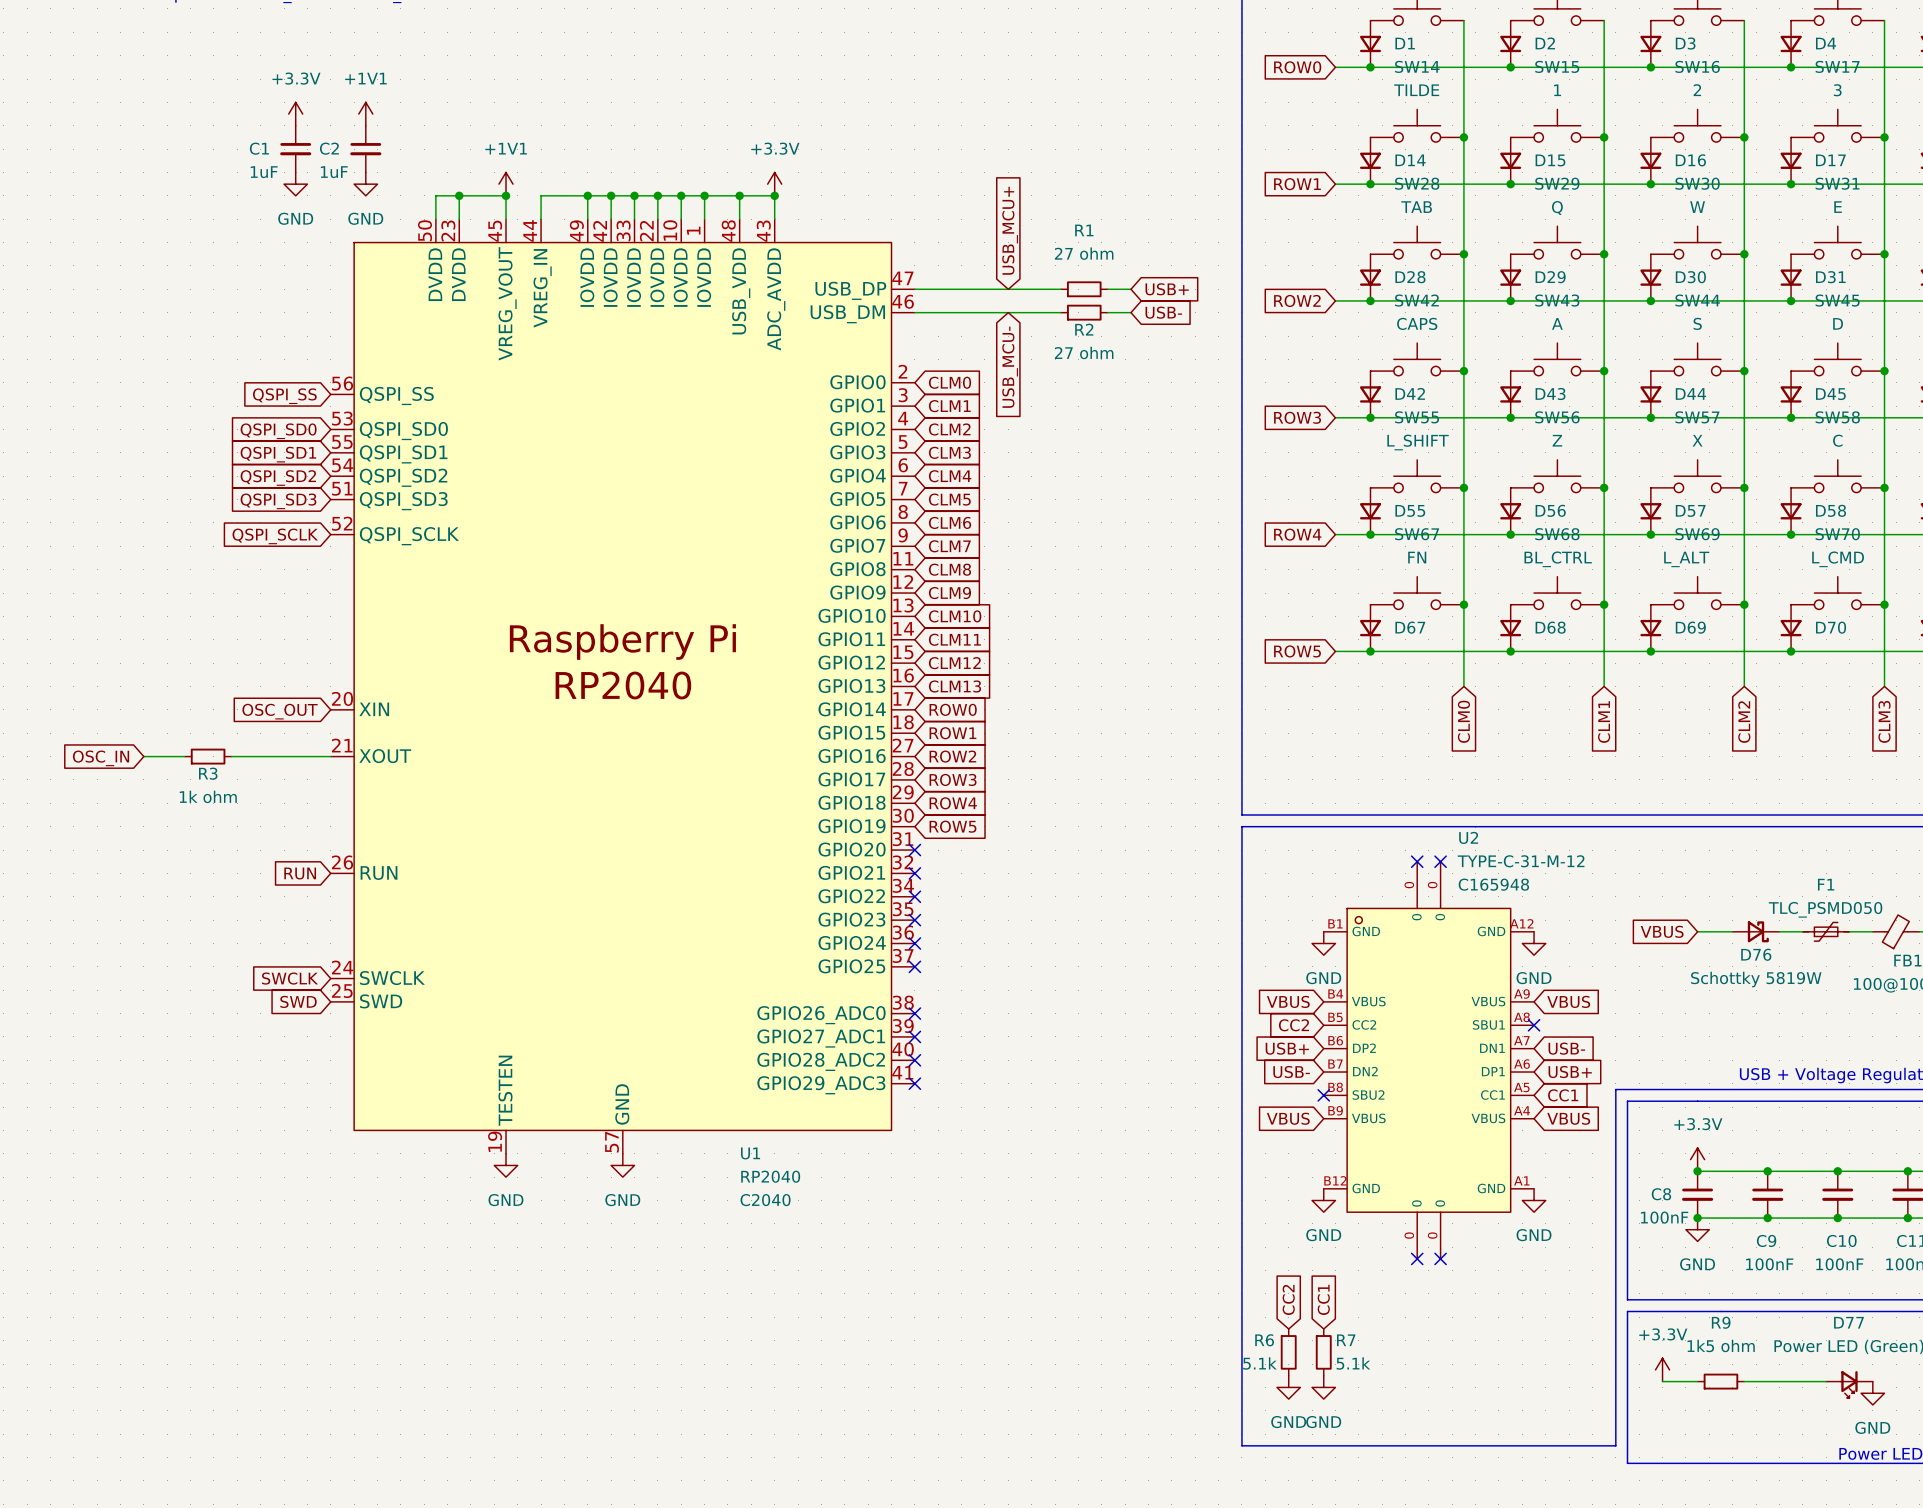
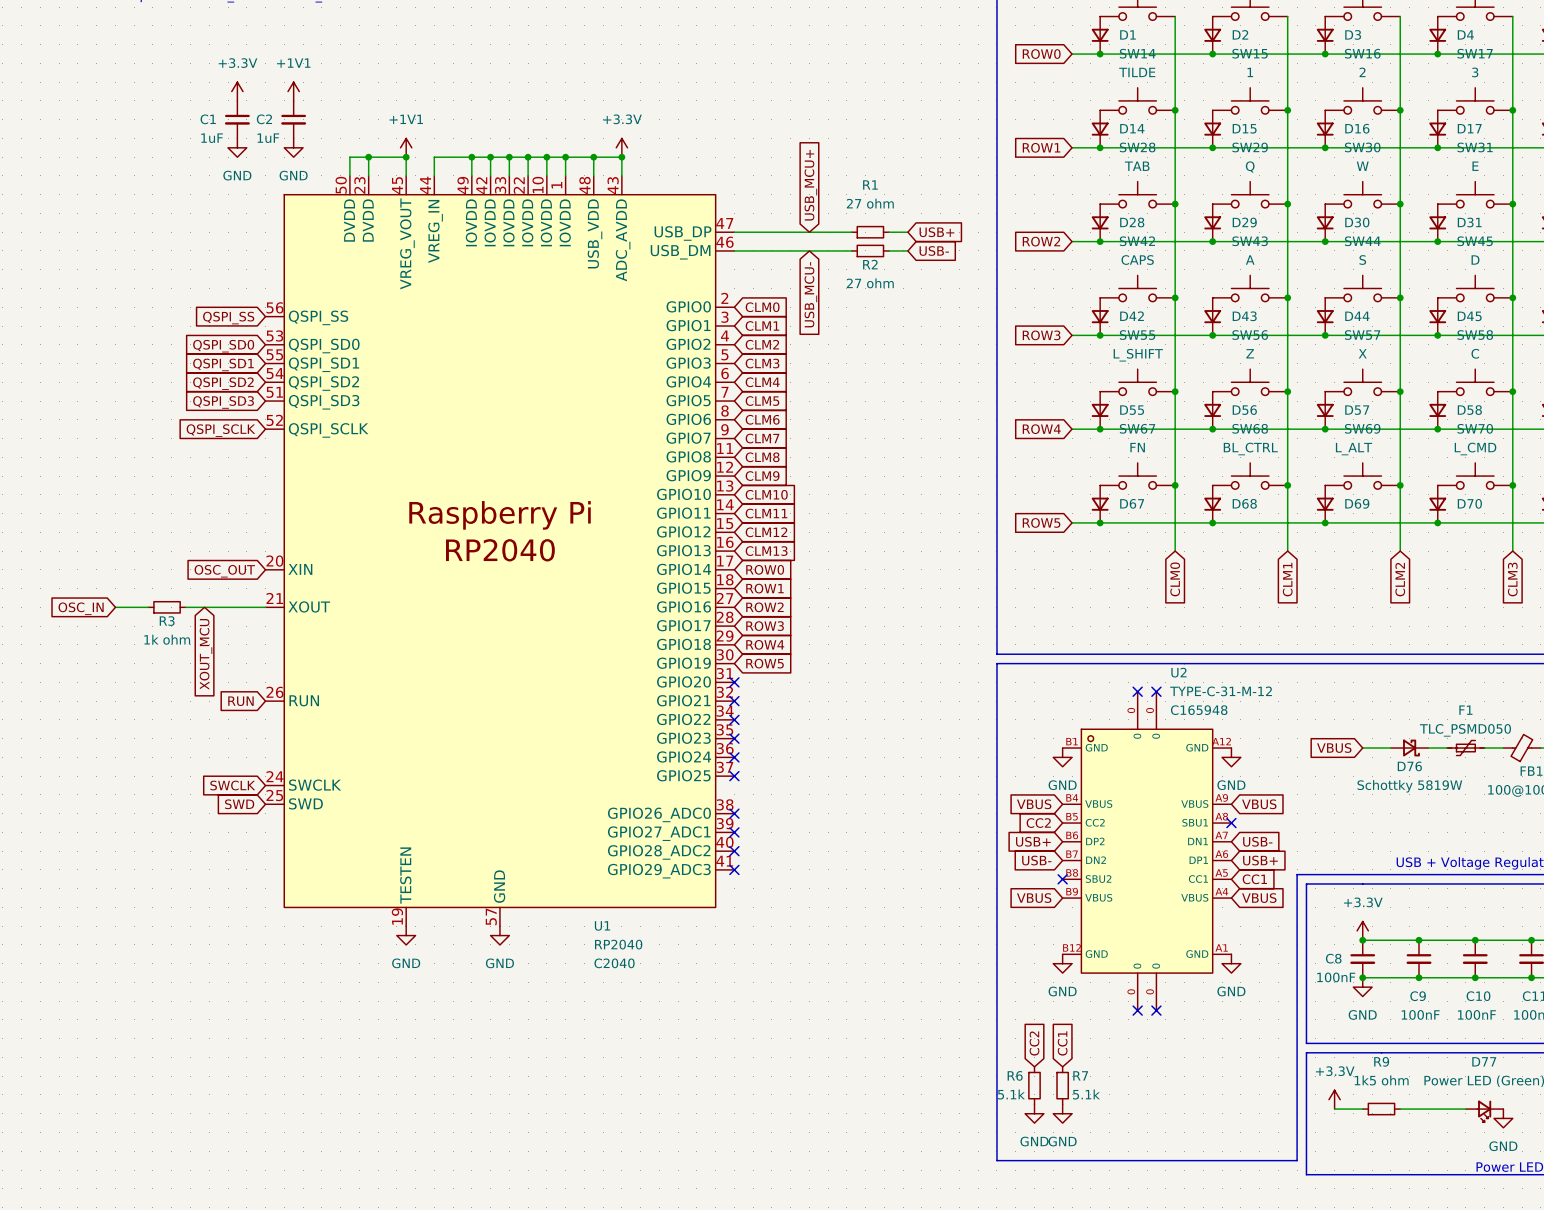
global label: none -> XOUT_MCU (205, 654)

